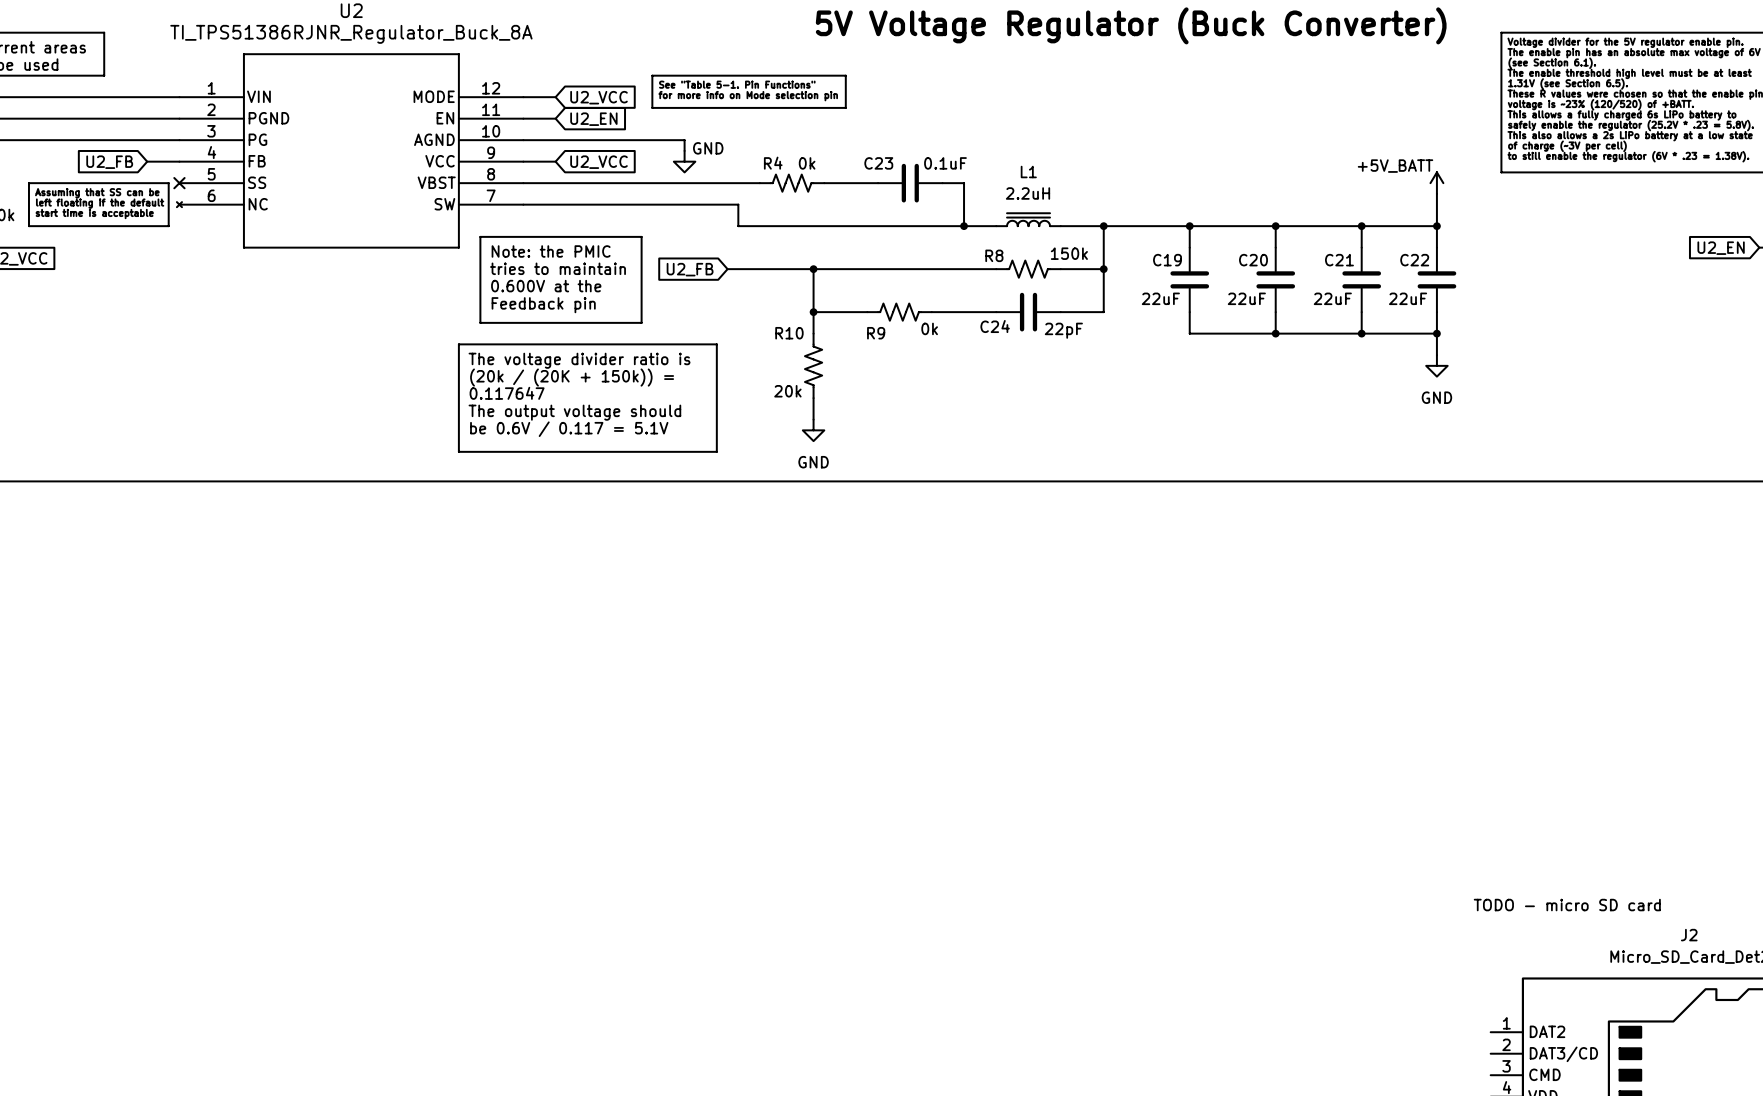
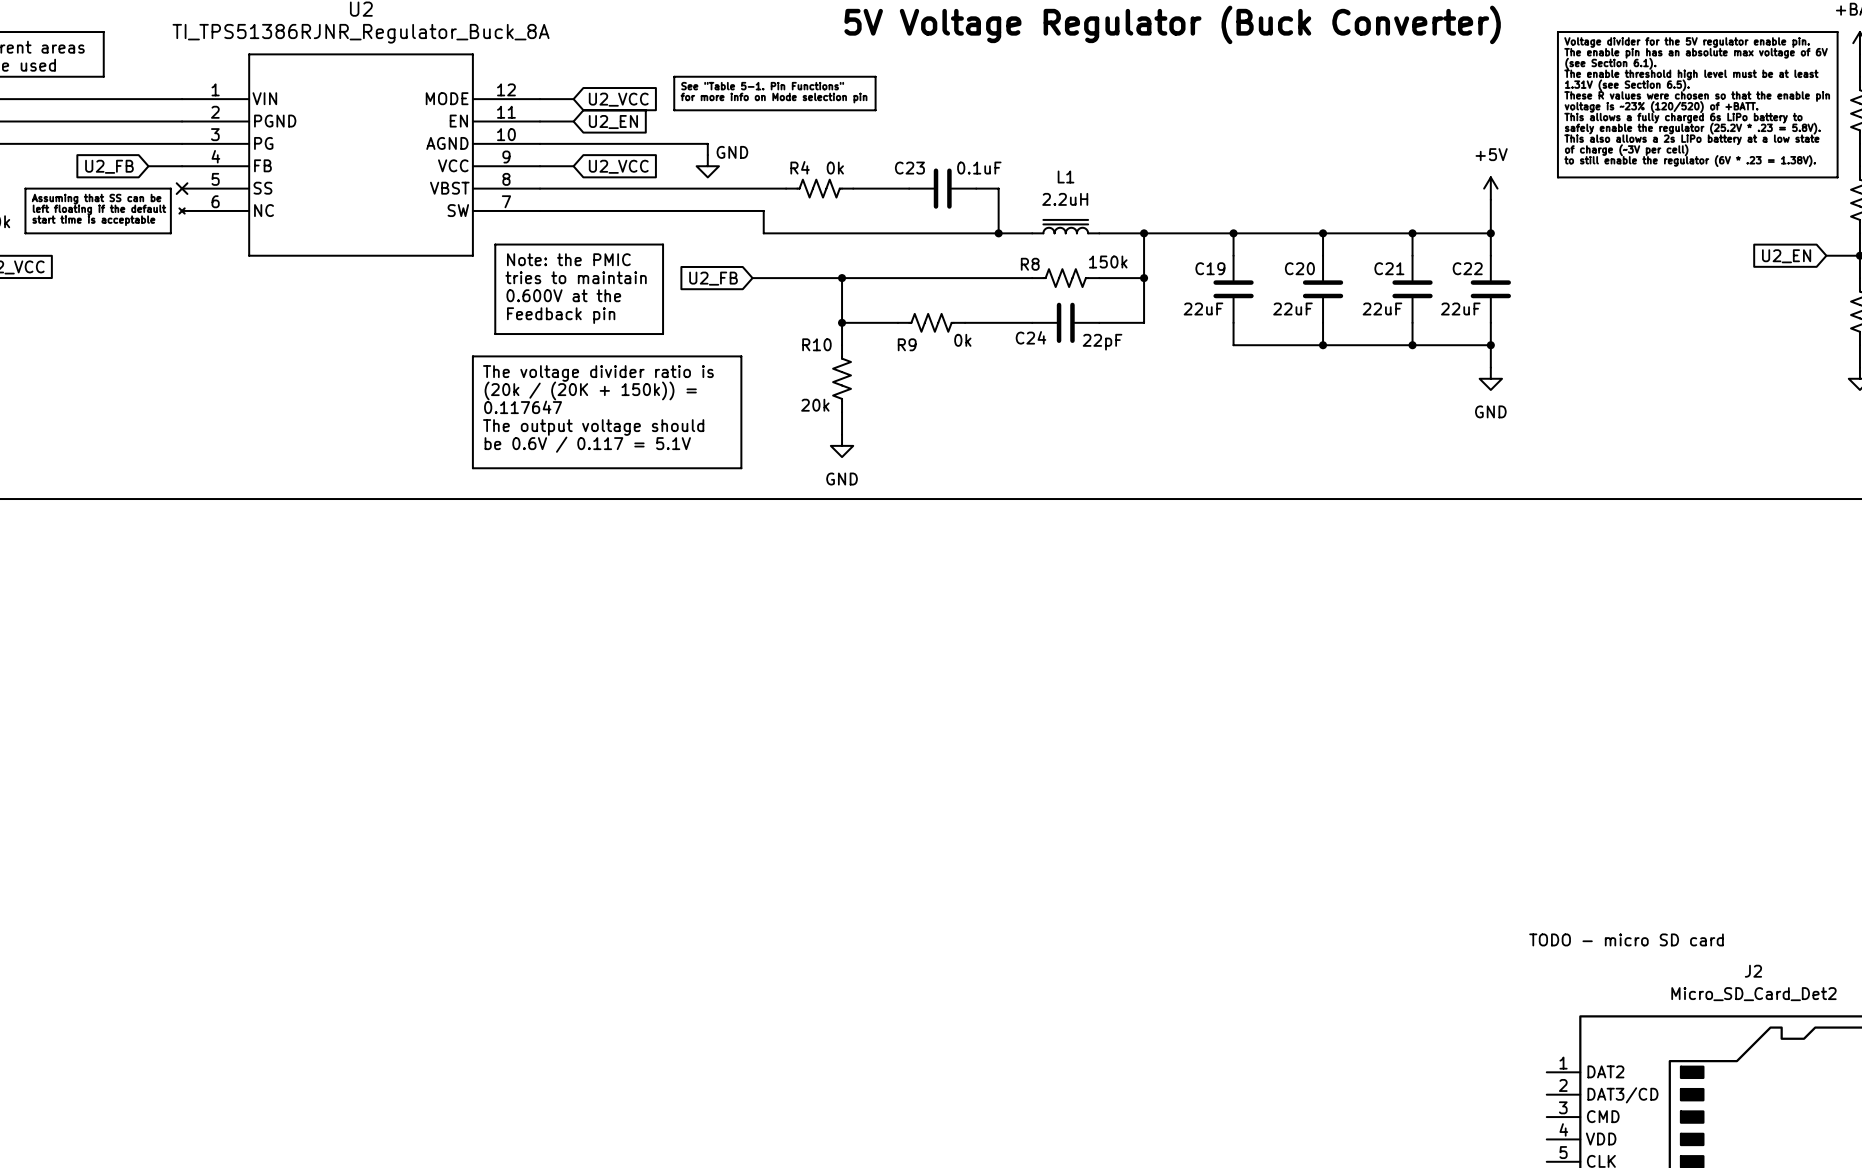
power symbol: +5V_BATT (1436, 183) -> +5V (1490, 188)

